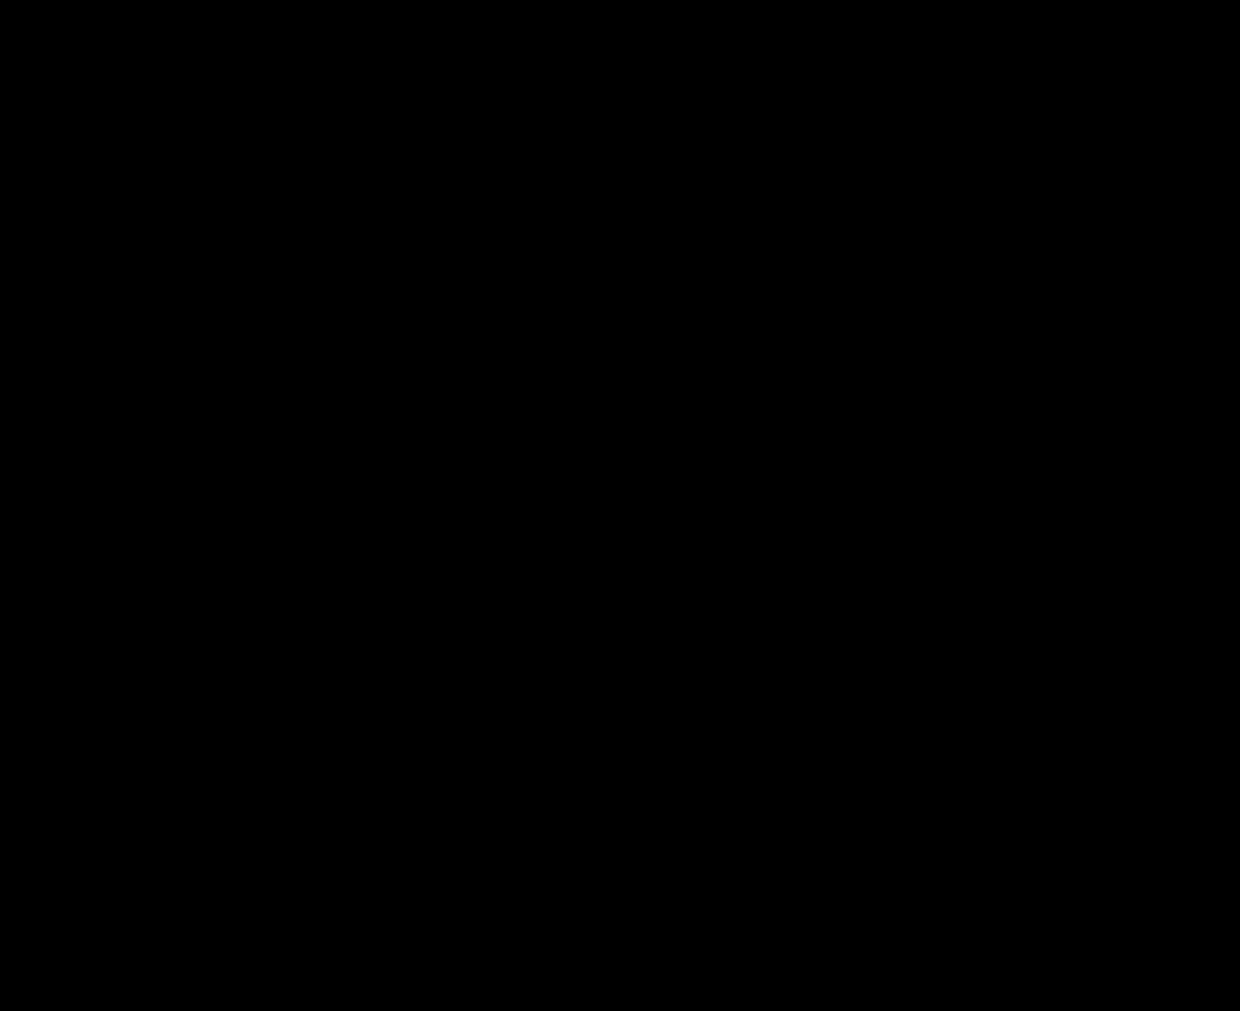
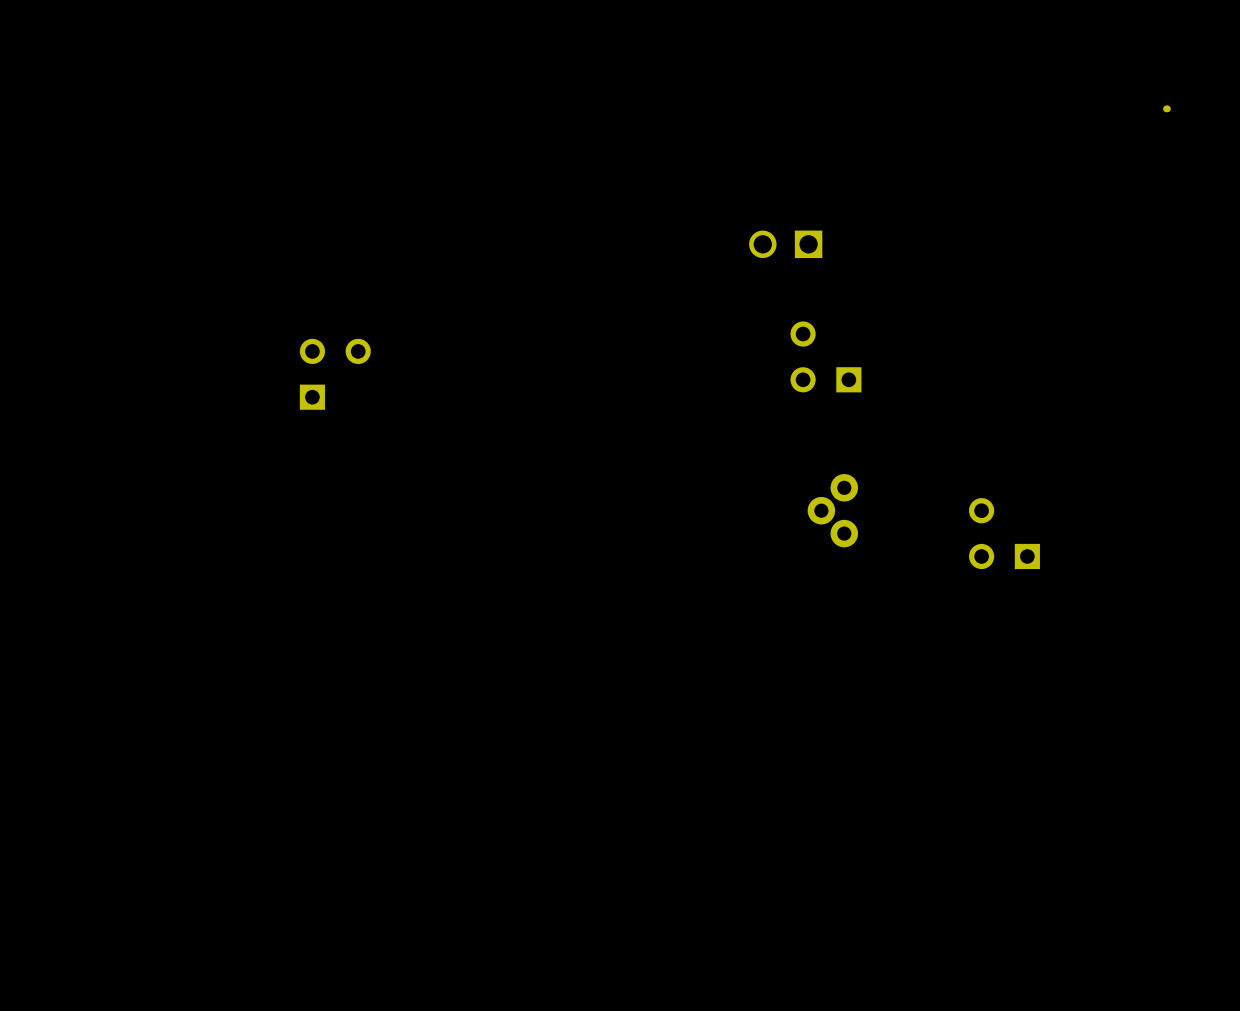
board edge: none -> (1167, 108) (1166, 108)
part: none -> (785, 244)
part: none -> (825, 356)
part: none -> (335, 374)
part: none -> (832, 510)
part: none -> (1004, 533)

